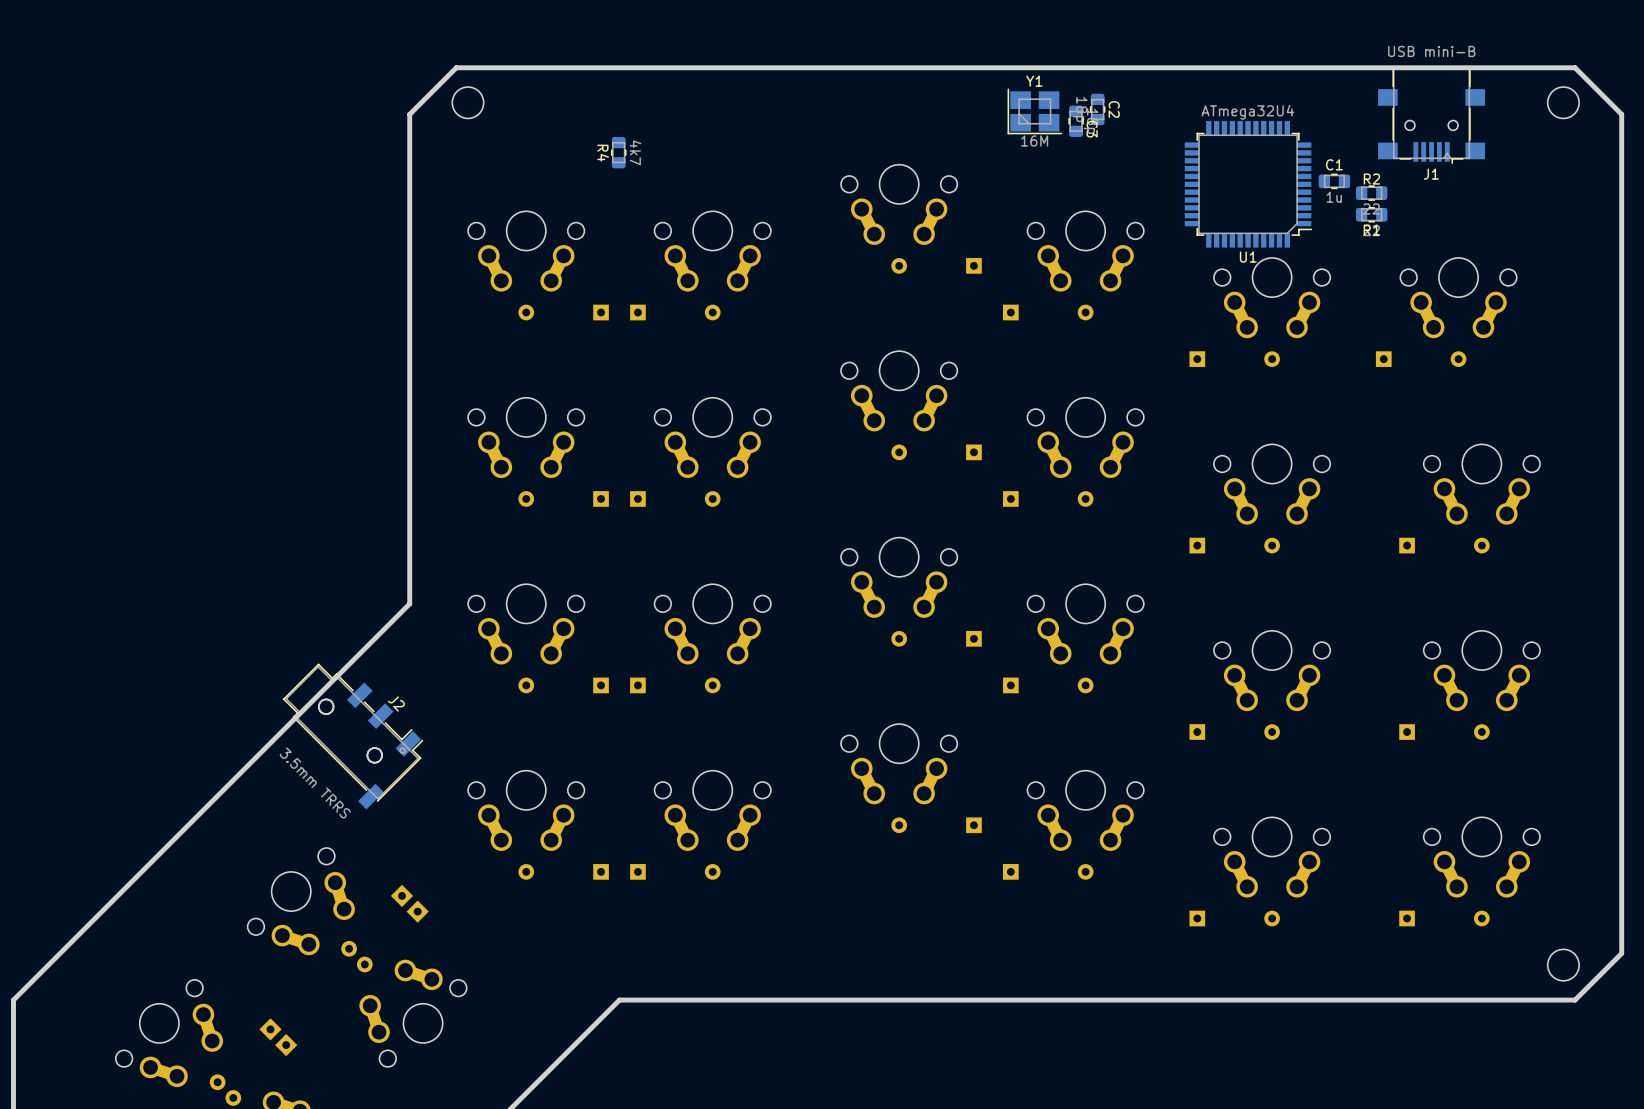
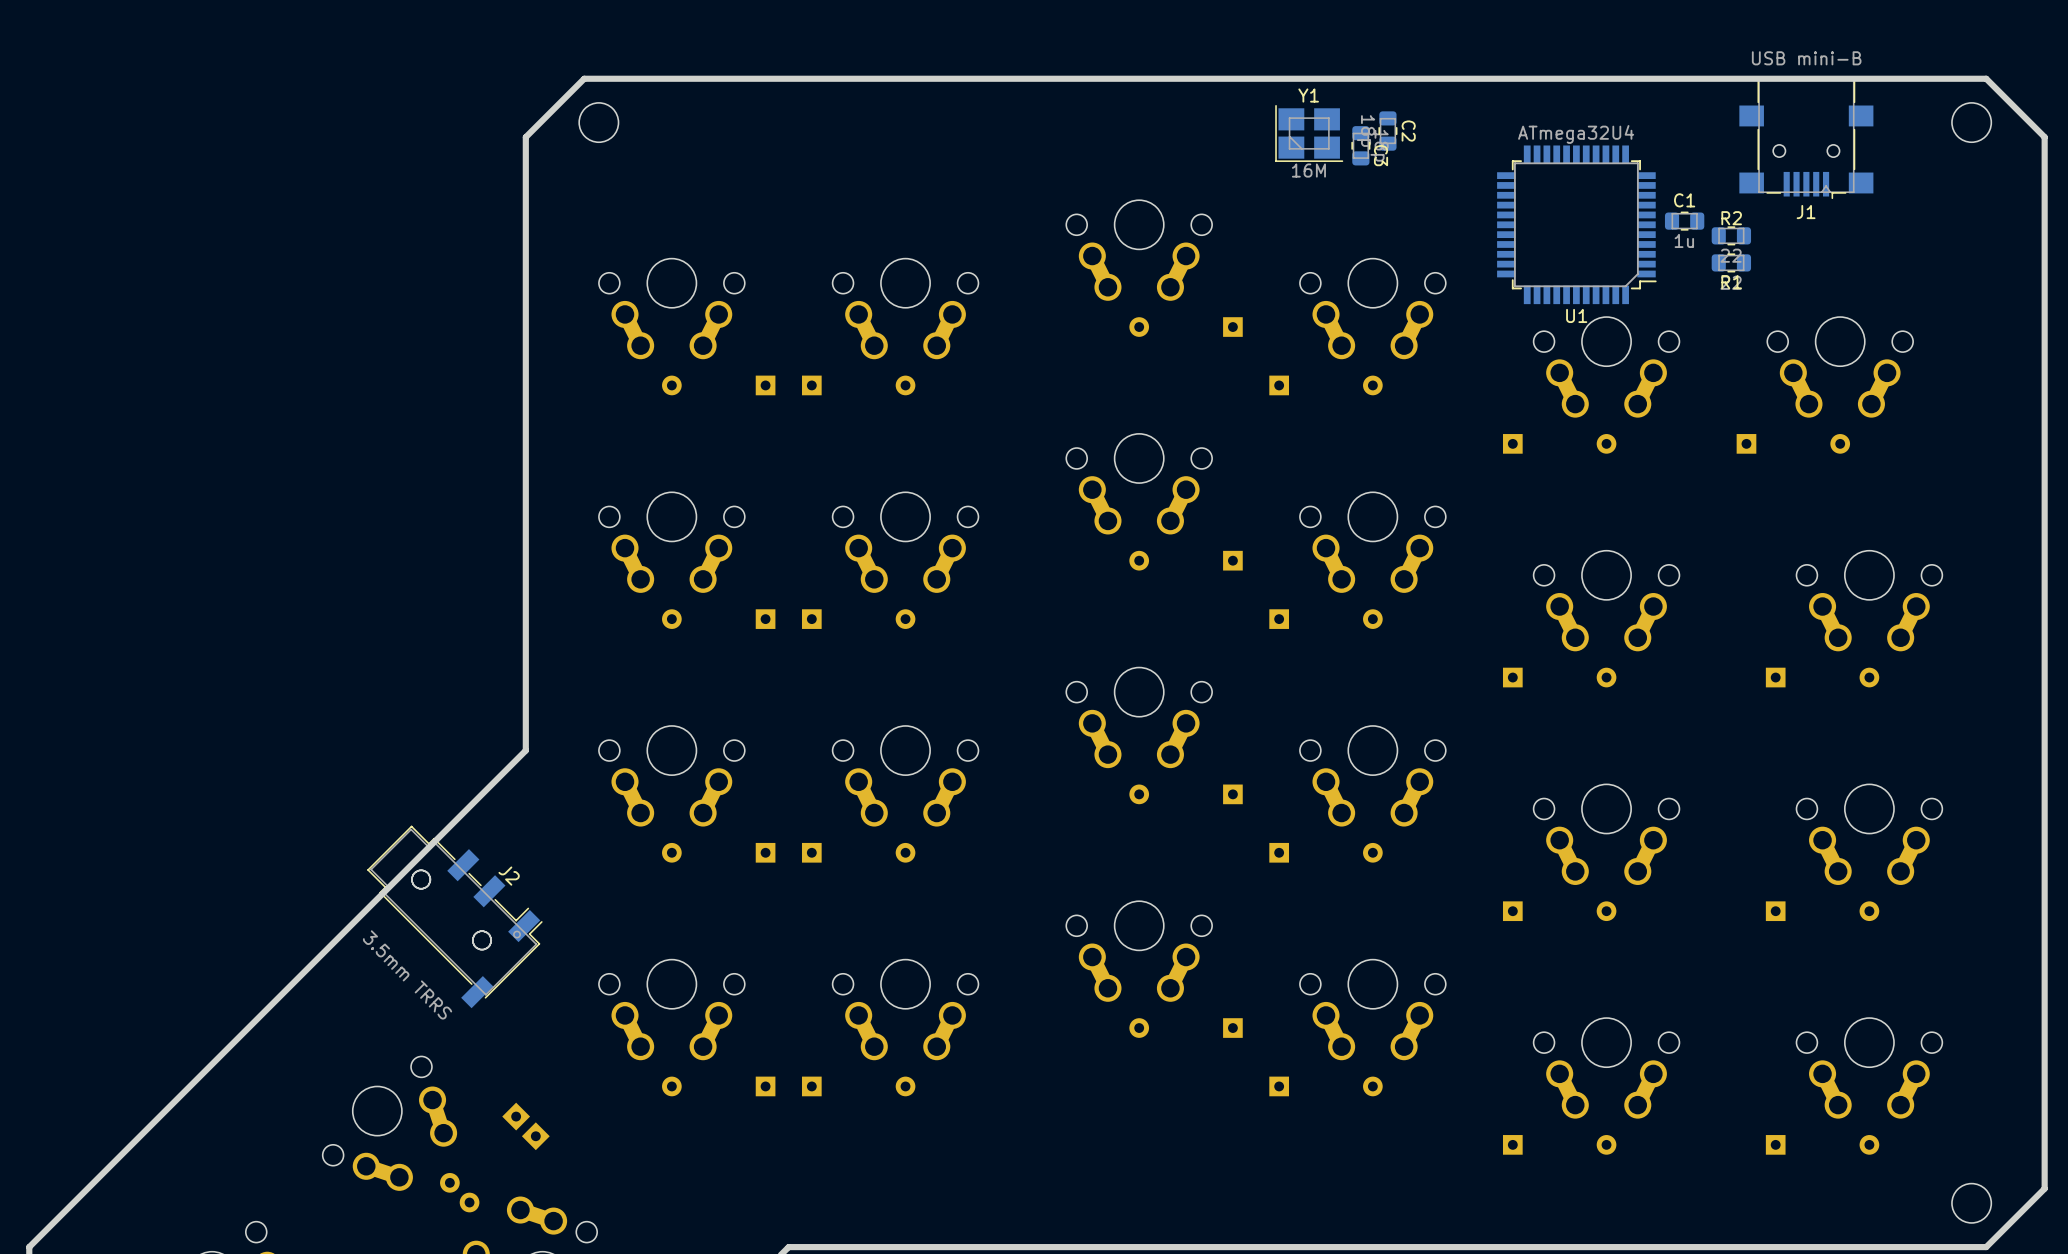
R4: 4k7 (618, 152) -> none

